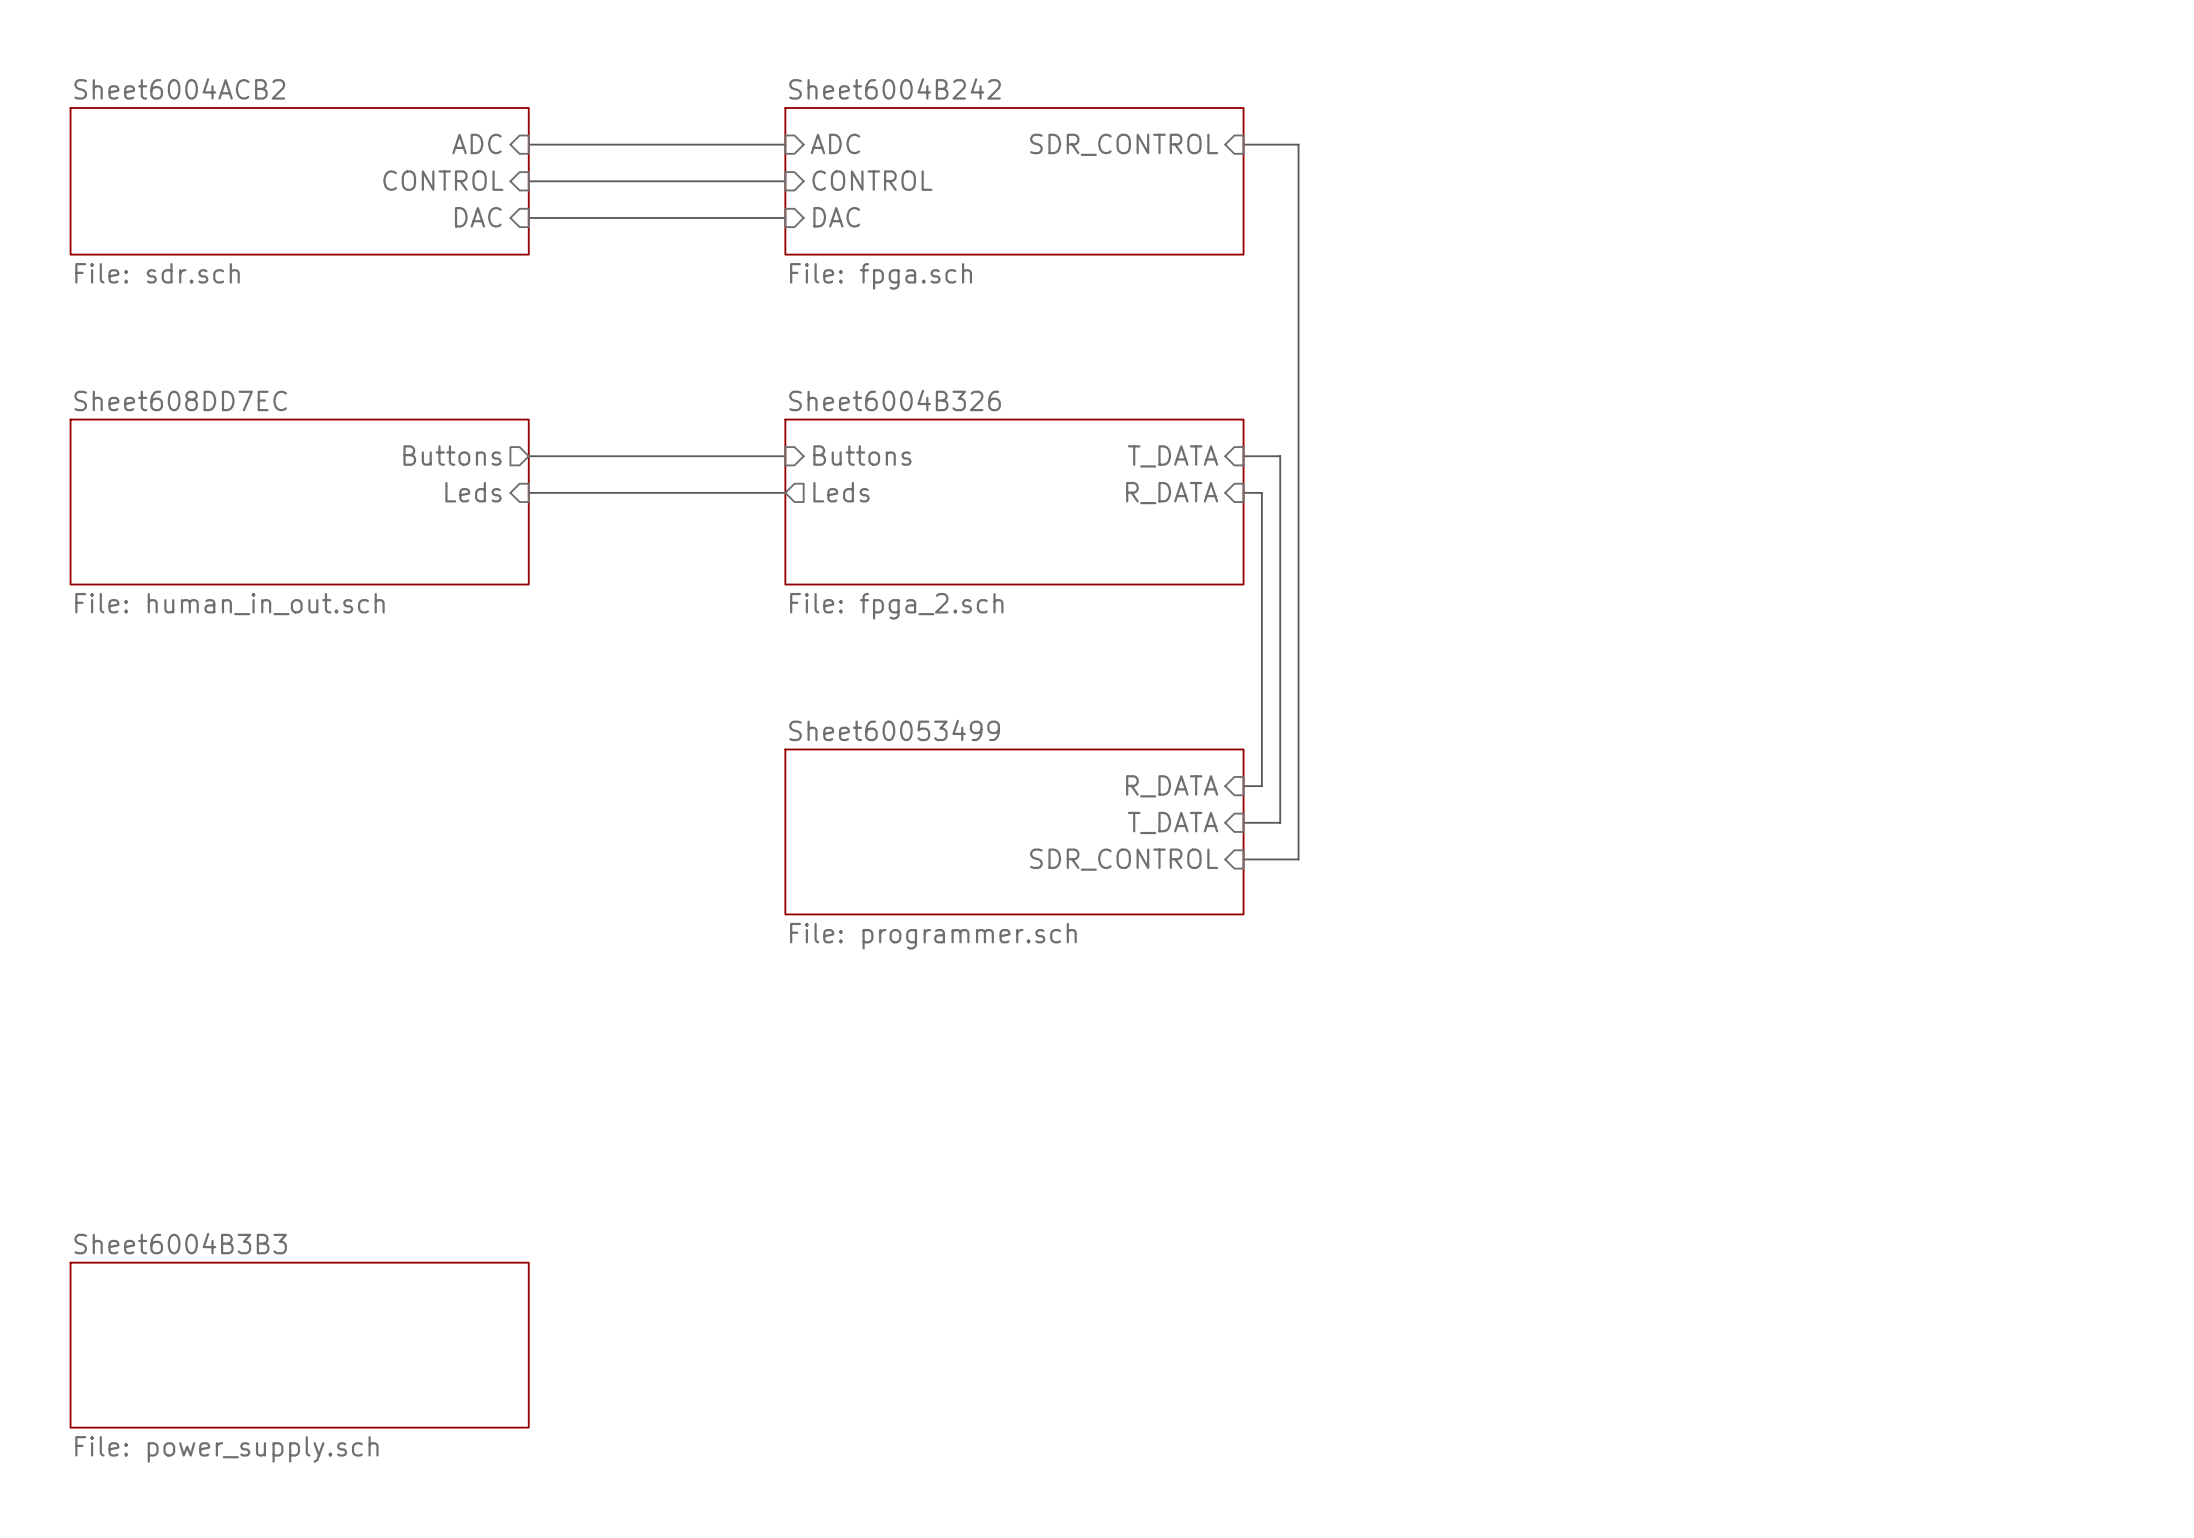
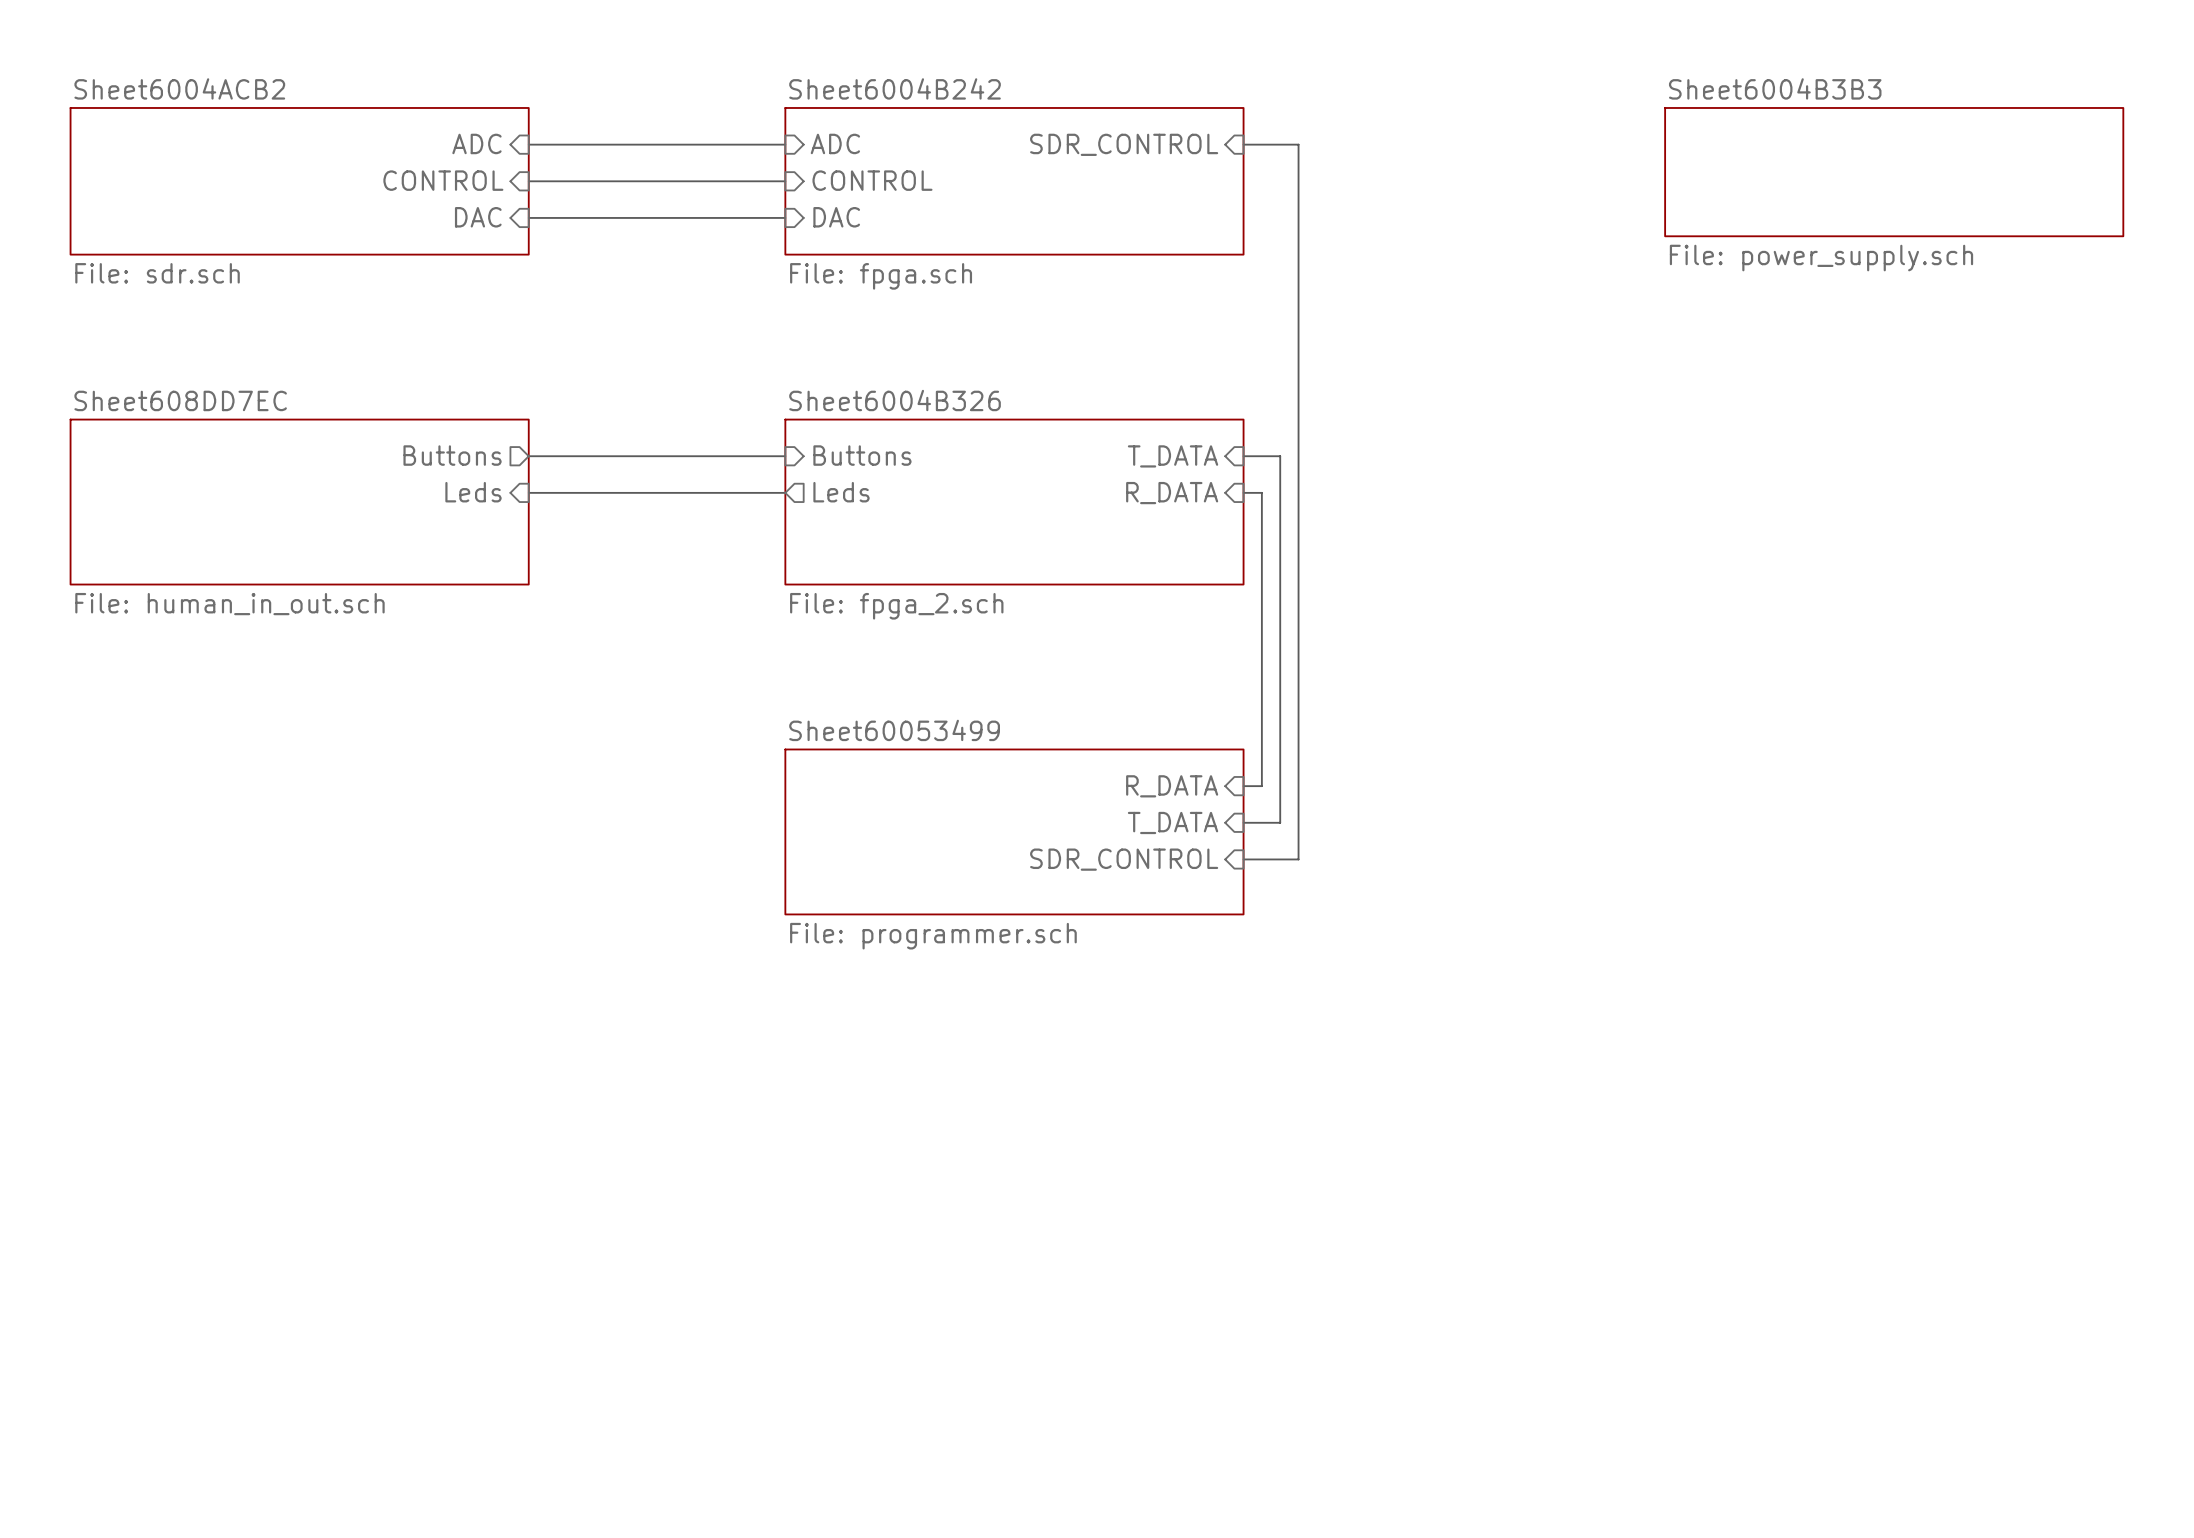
sheet Sheet6004B3B3 shape: [70, 1262, 529, 1428] -> [1665, 107, 2124, 237]

